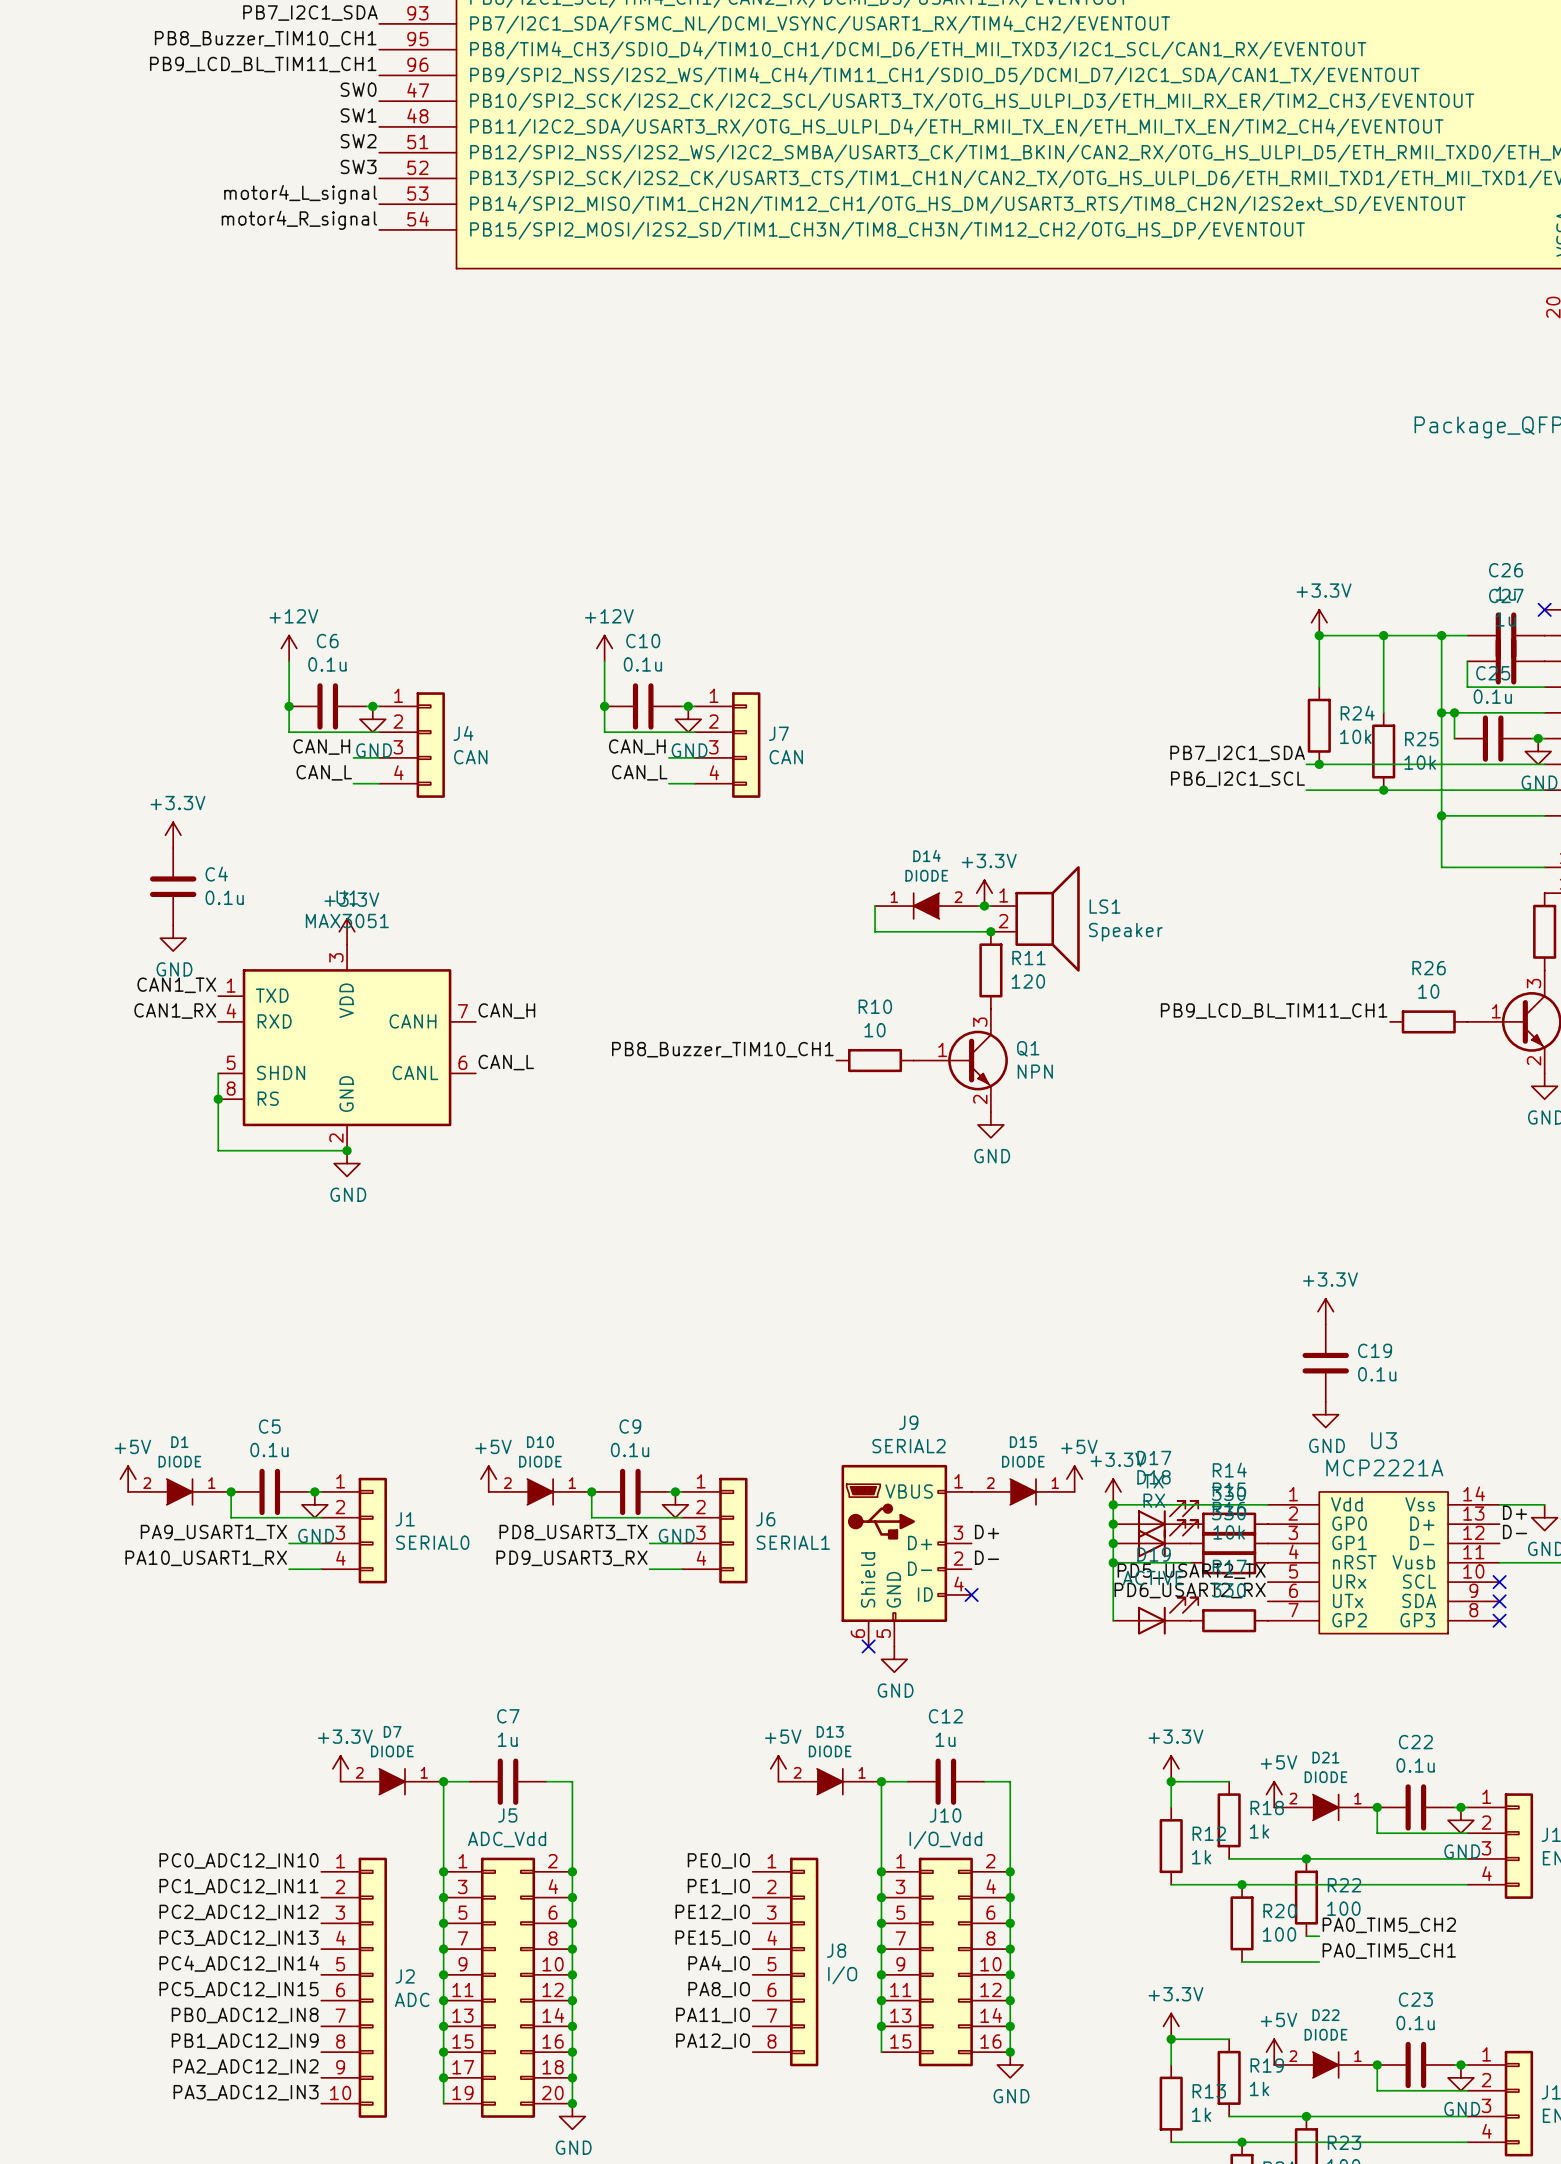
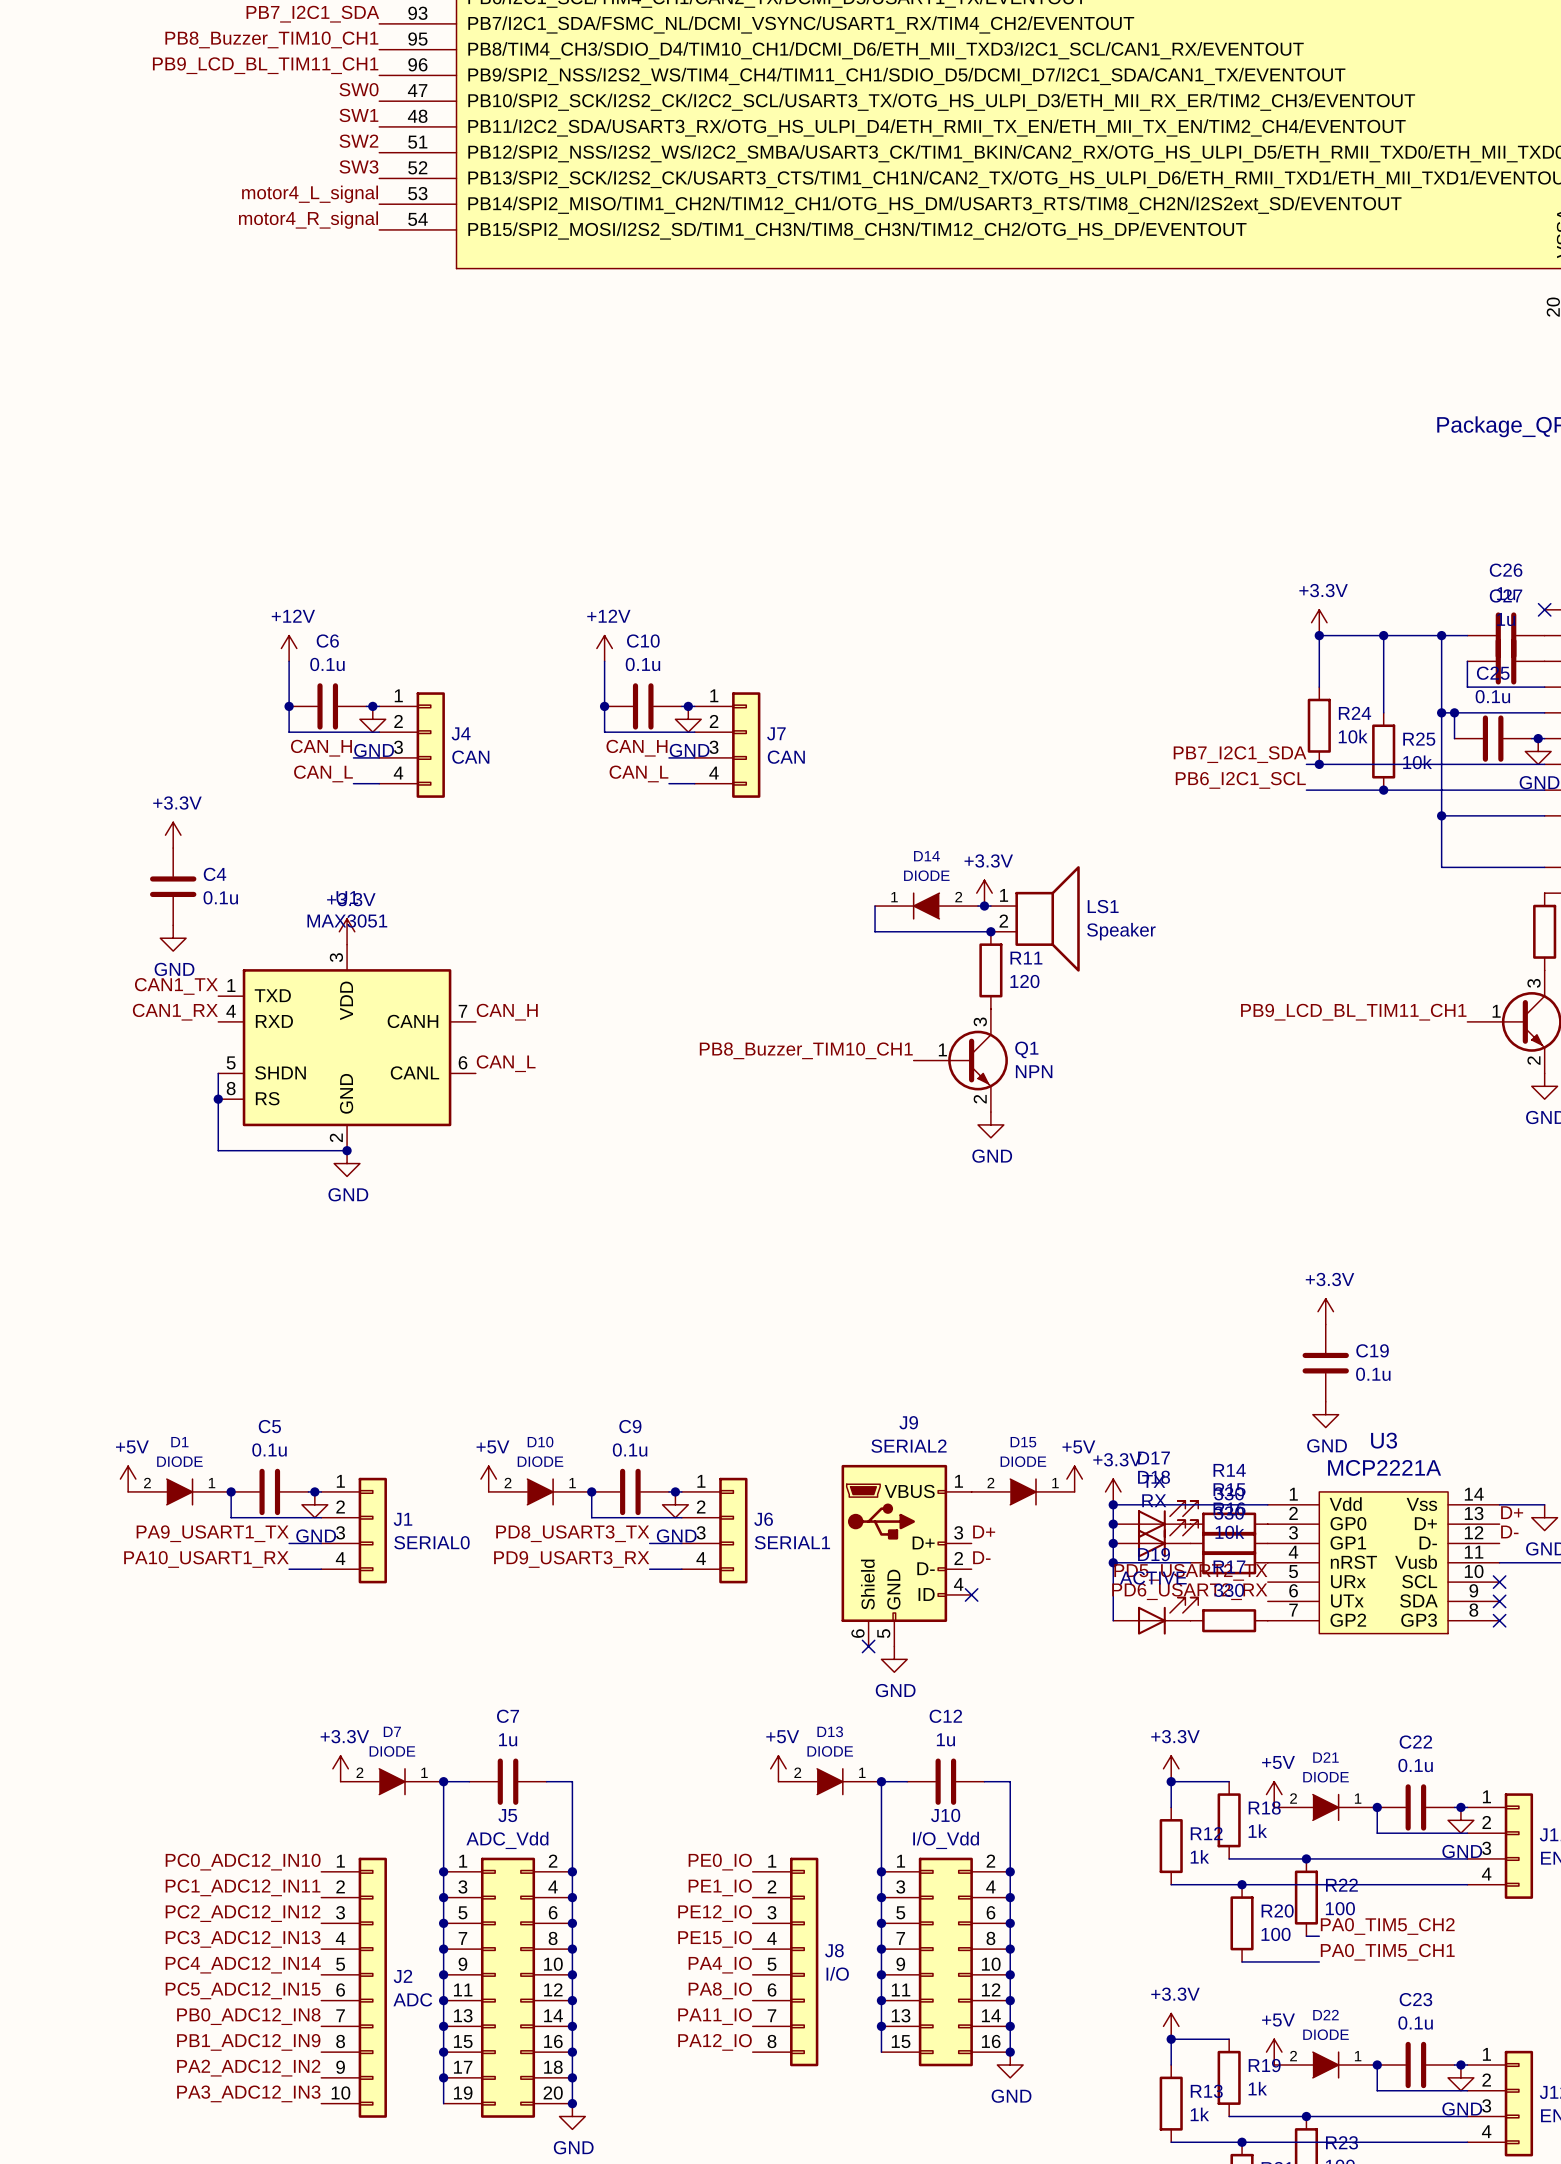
label position: PB9_LCD_BL_TIM11_CH1 (1274, 1011) -> PB9_LCD_BL_TIM11_CH1 (1353, 1012)
R26: 10 (1428, 1021) -> none
label position: PB8_Buzzer_TIM10_CH1 (722, 1049) -> PB8_Buzzer_TIM10_CH1 (806, 1050)
R10: 10 (875, 1060) -> none

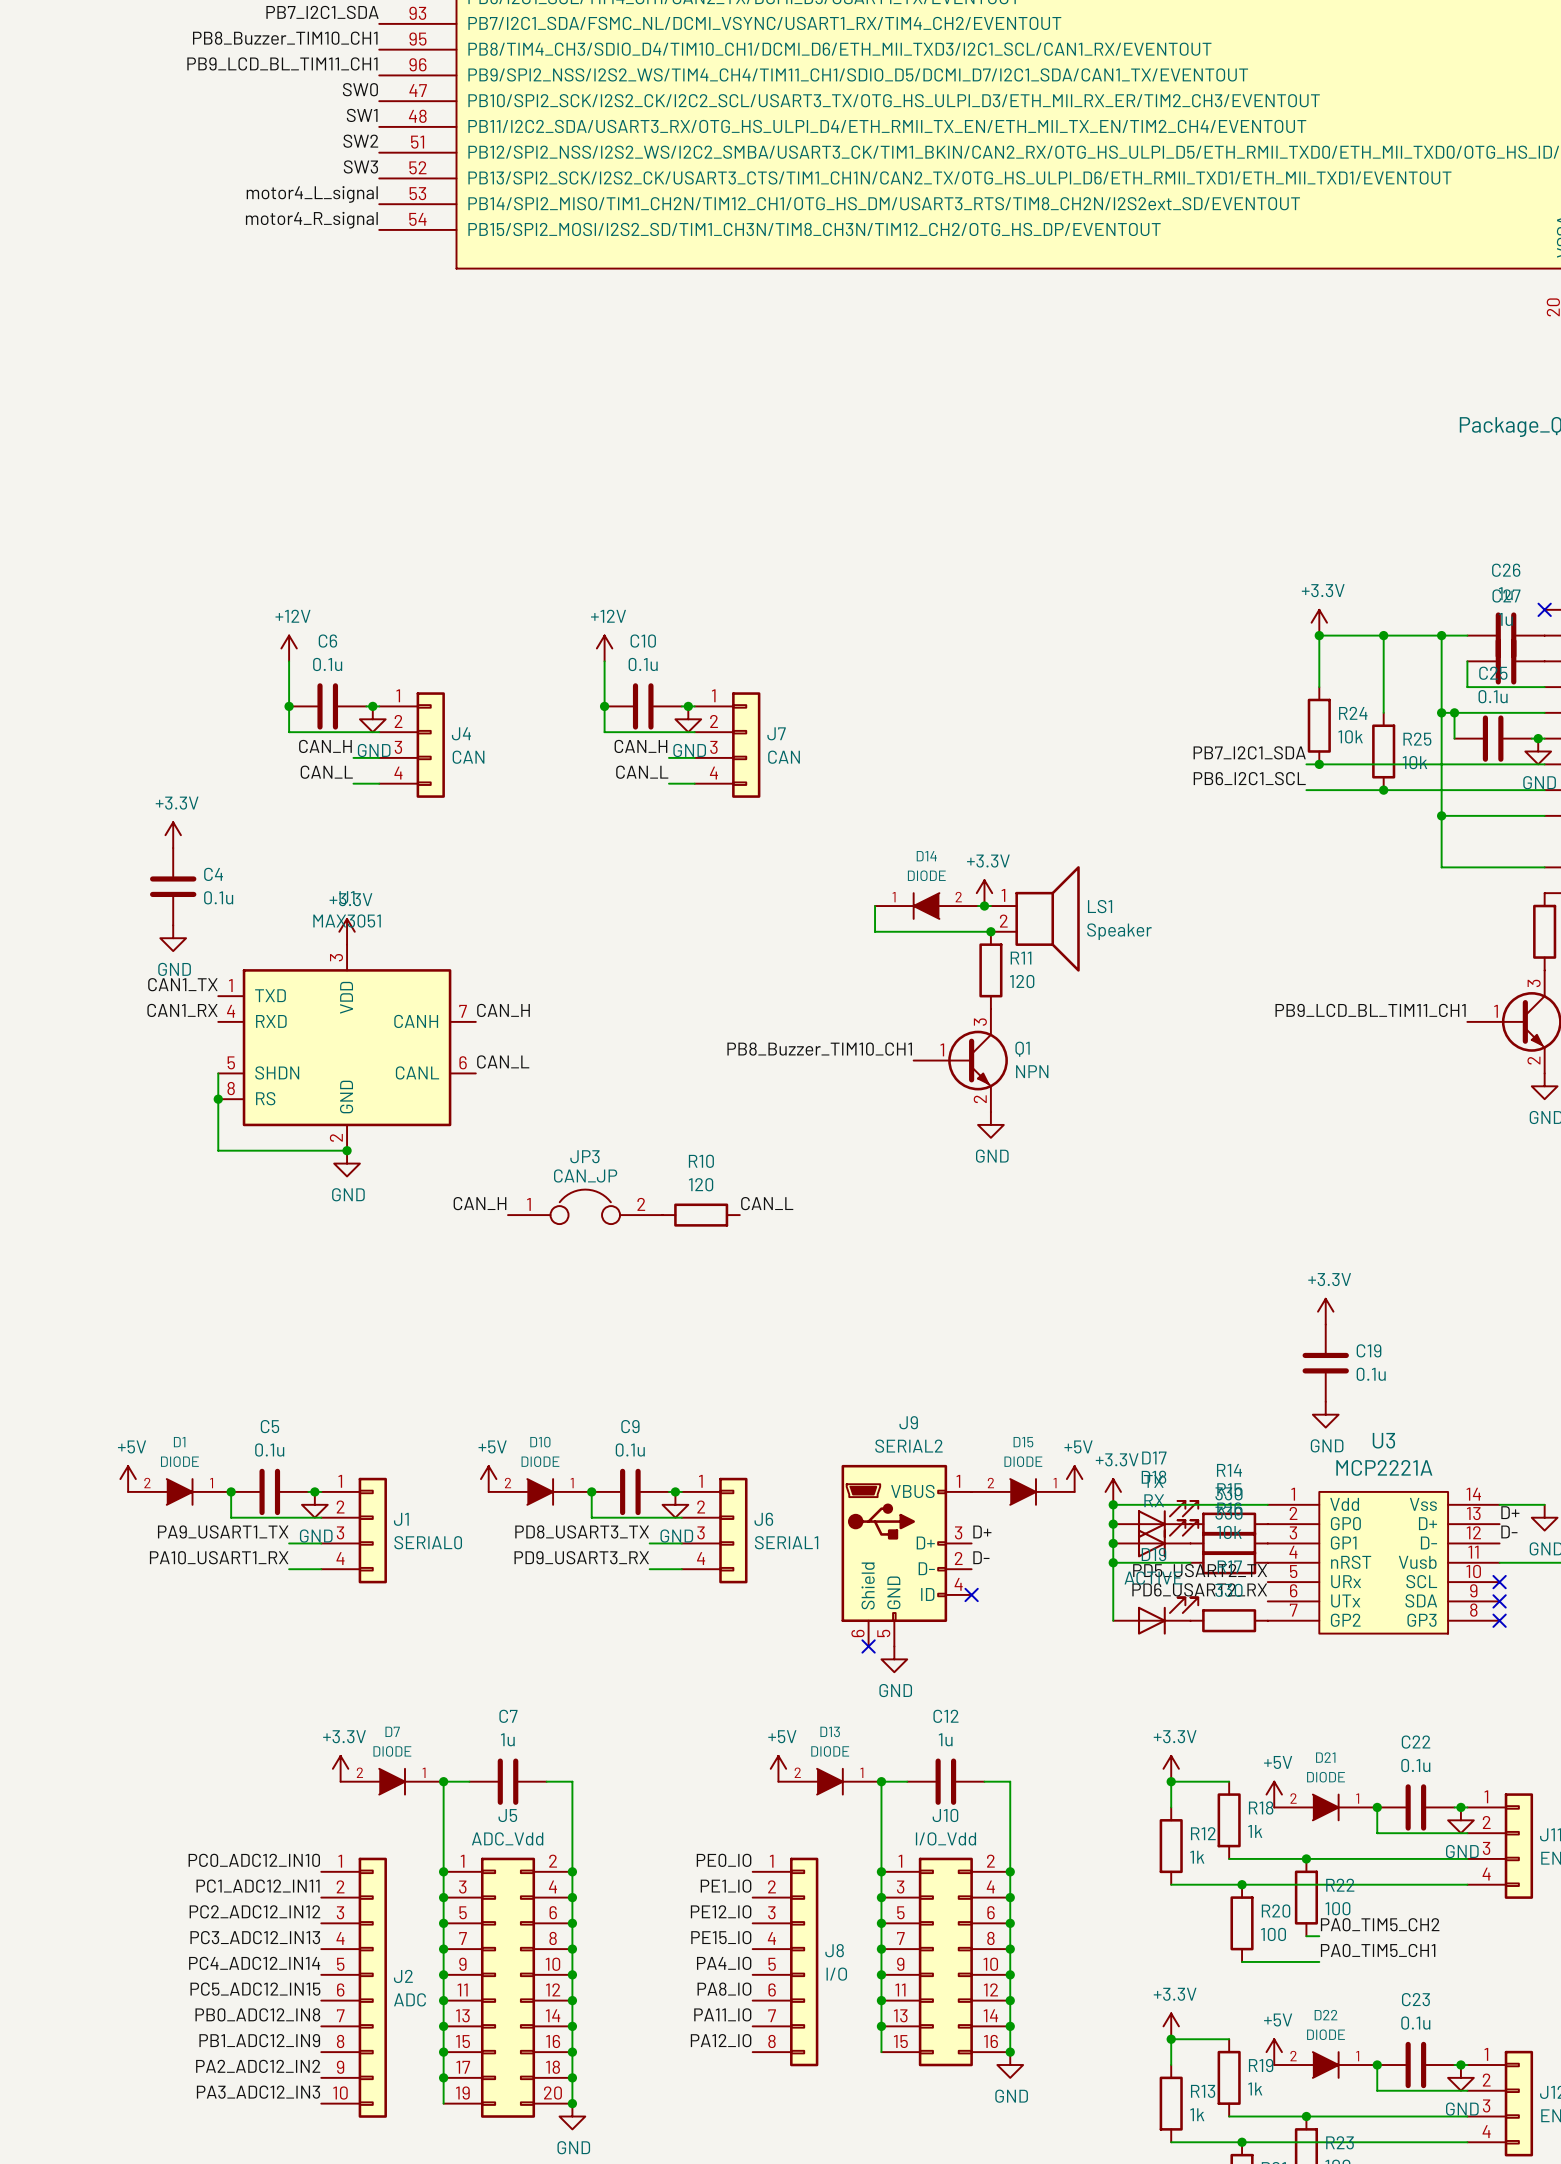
label: none -> CAN_H (479, 1203)
label: none -> CAN_L (767, 1203)
JP3: none -> CAN_JP (585, 1206)
R10: none -> 120 (701, 1215)

